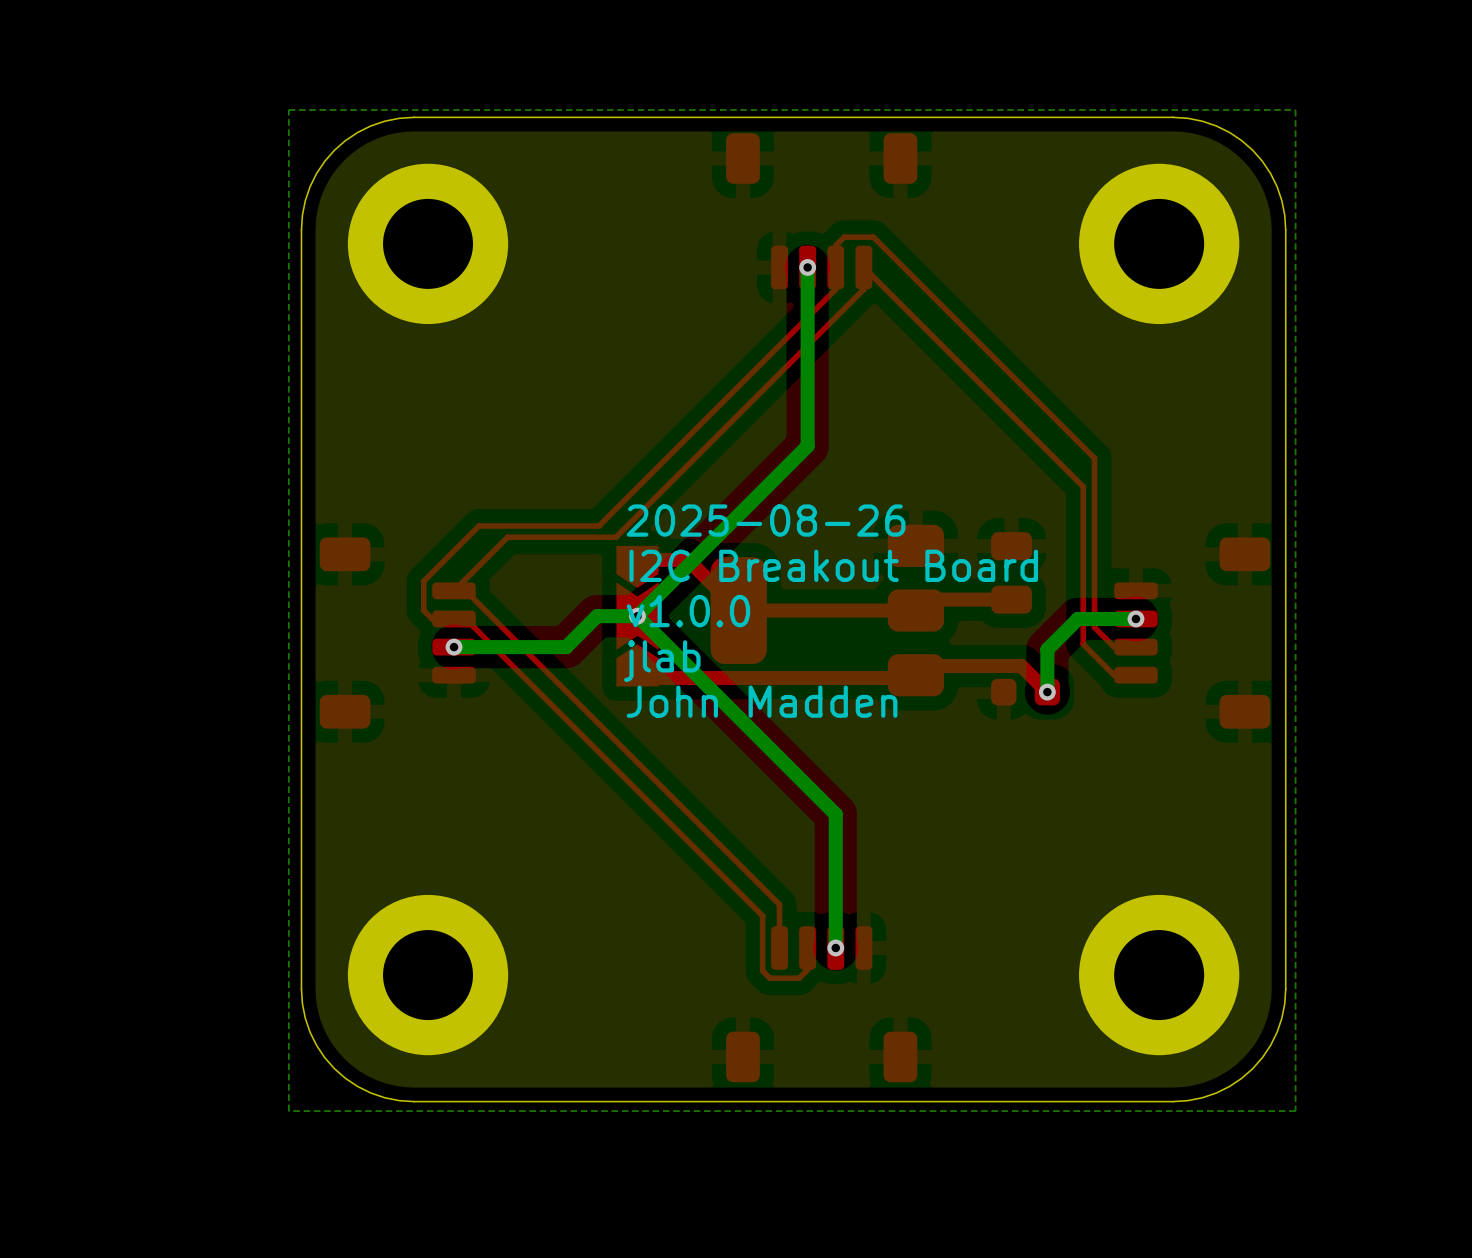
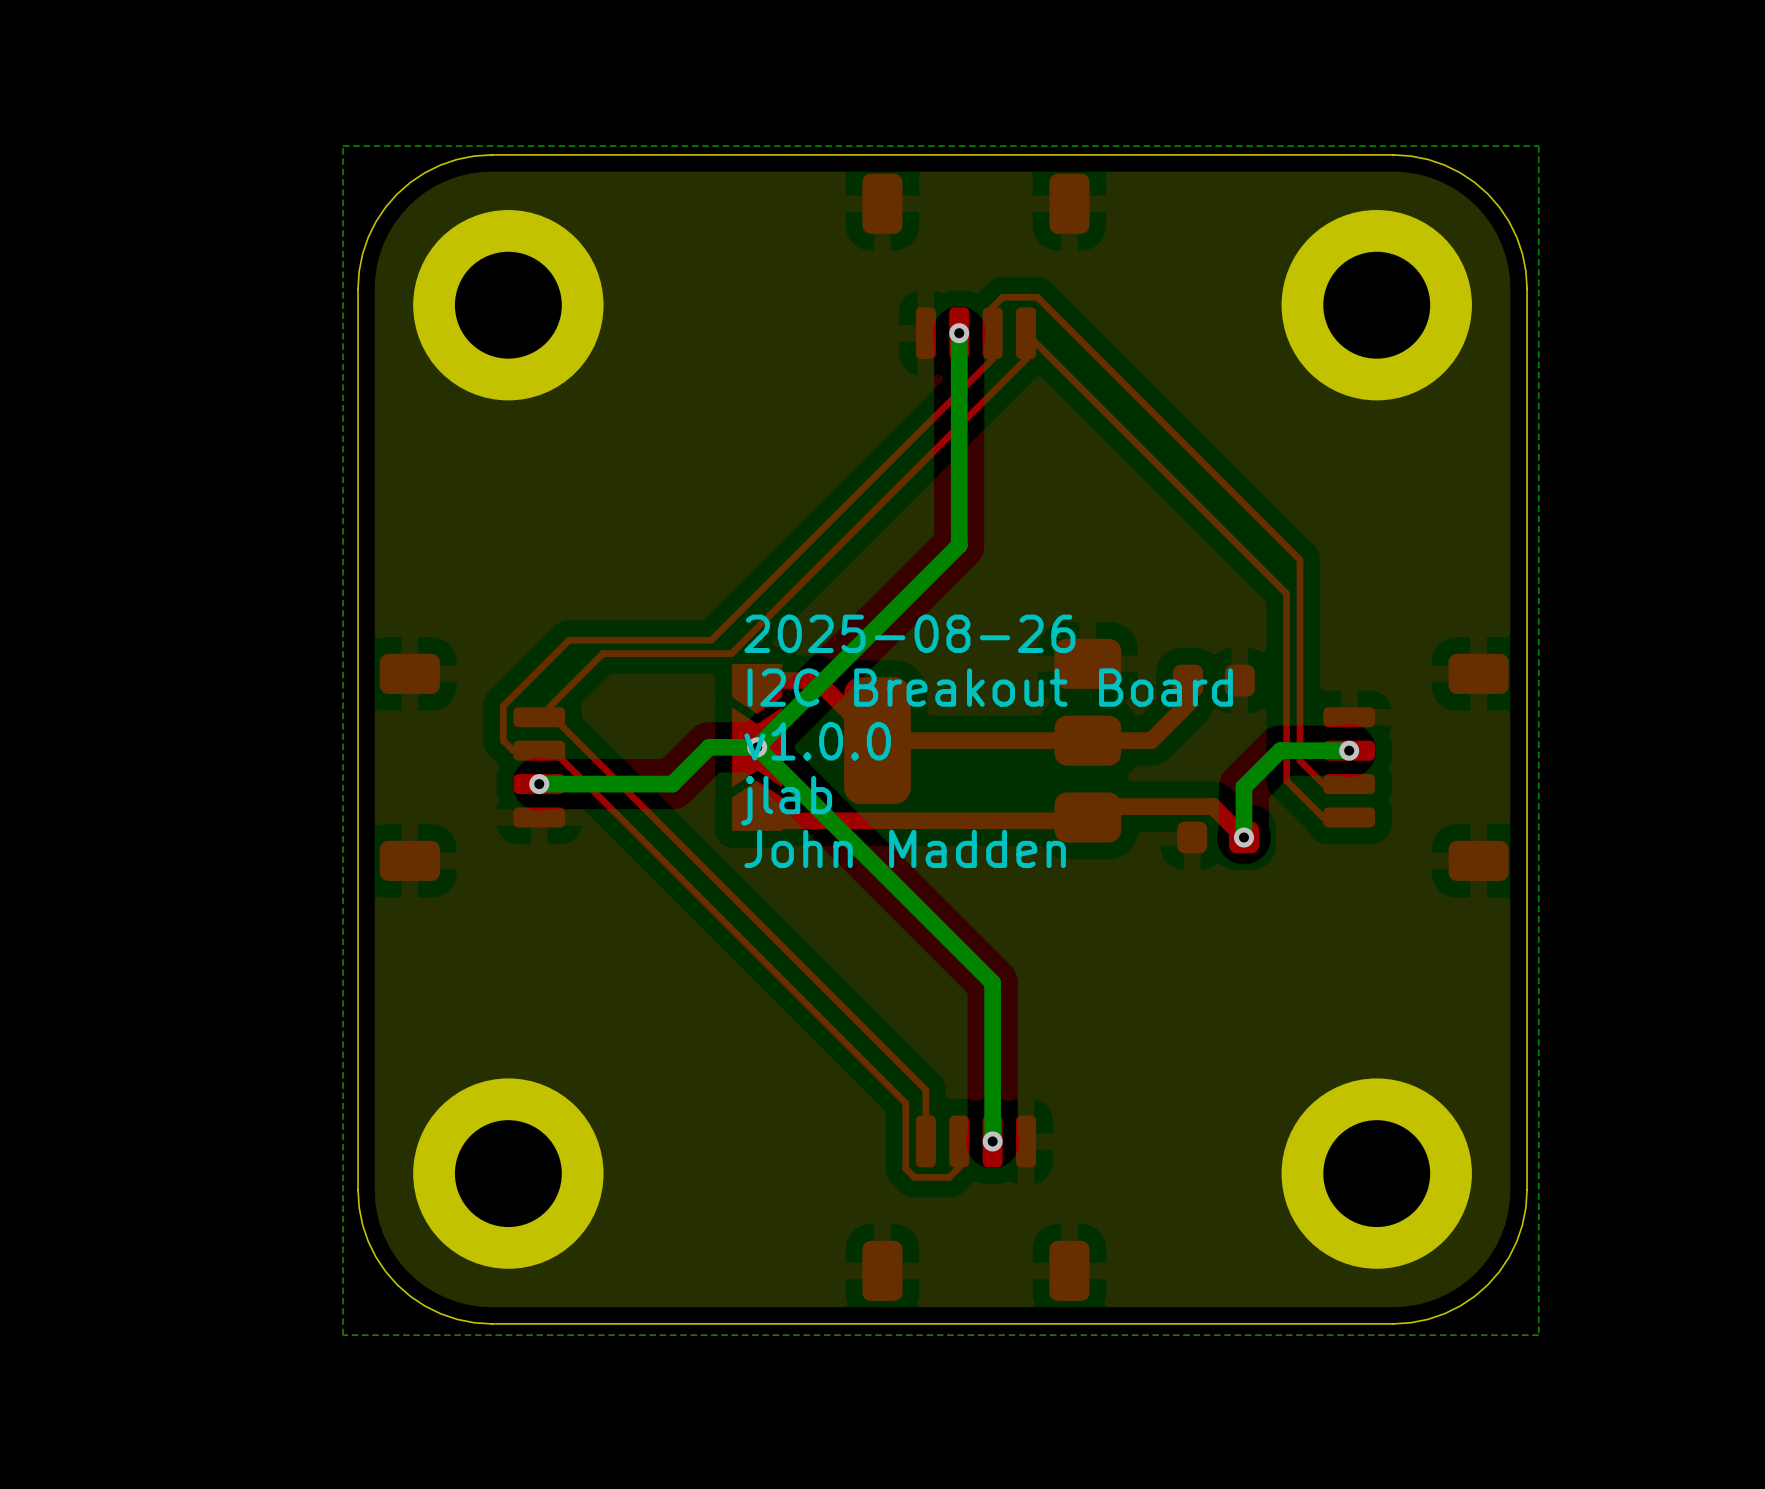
part footprint: [991, 532, 1032, 614] -> [1173, 664, 1255, 697]
top track: (1011, 599) (926, 599) (915, 610) -> (1188, 680) (1188, 703) (1151, 740) (1087, 740)

